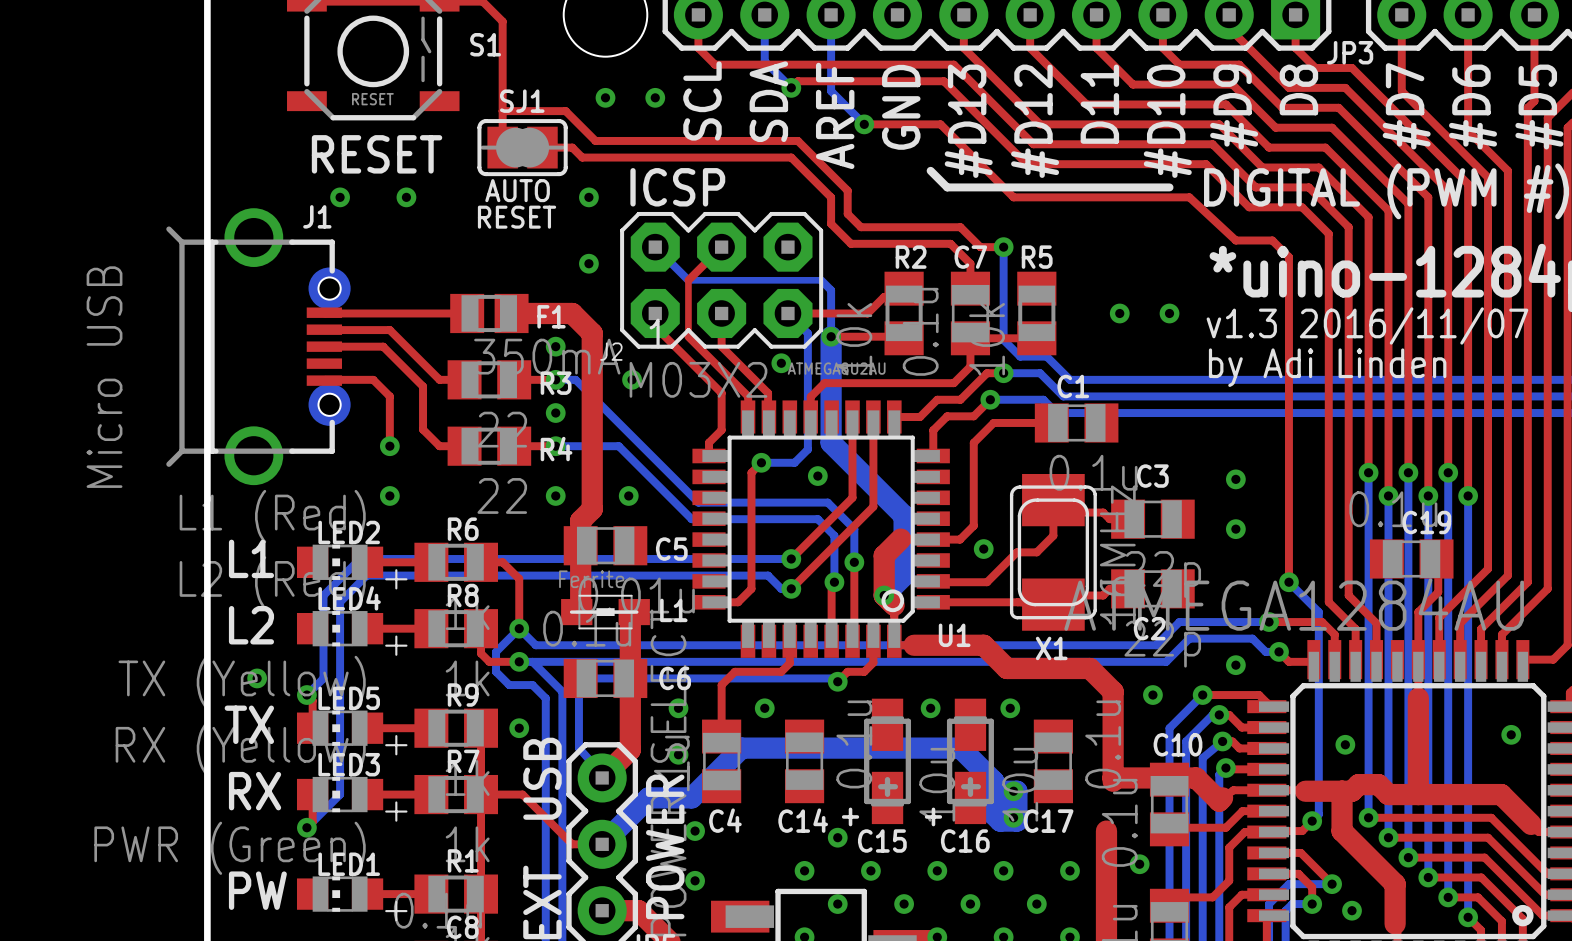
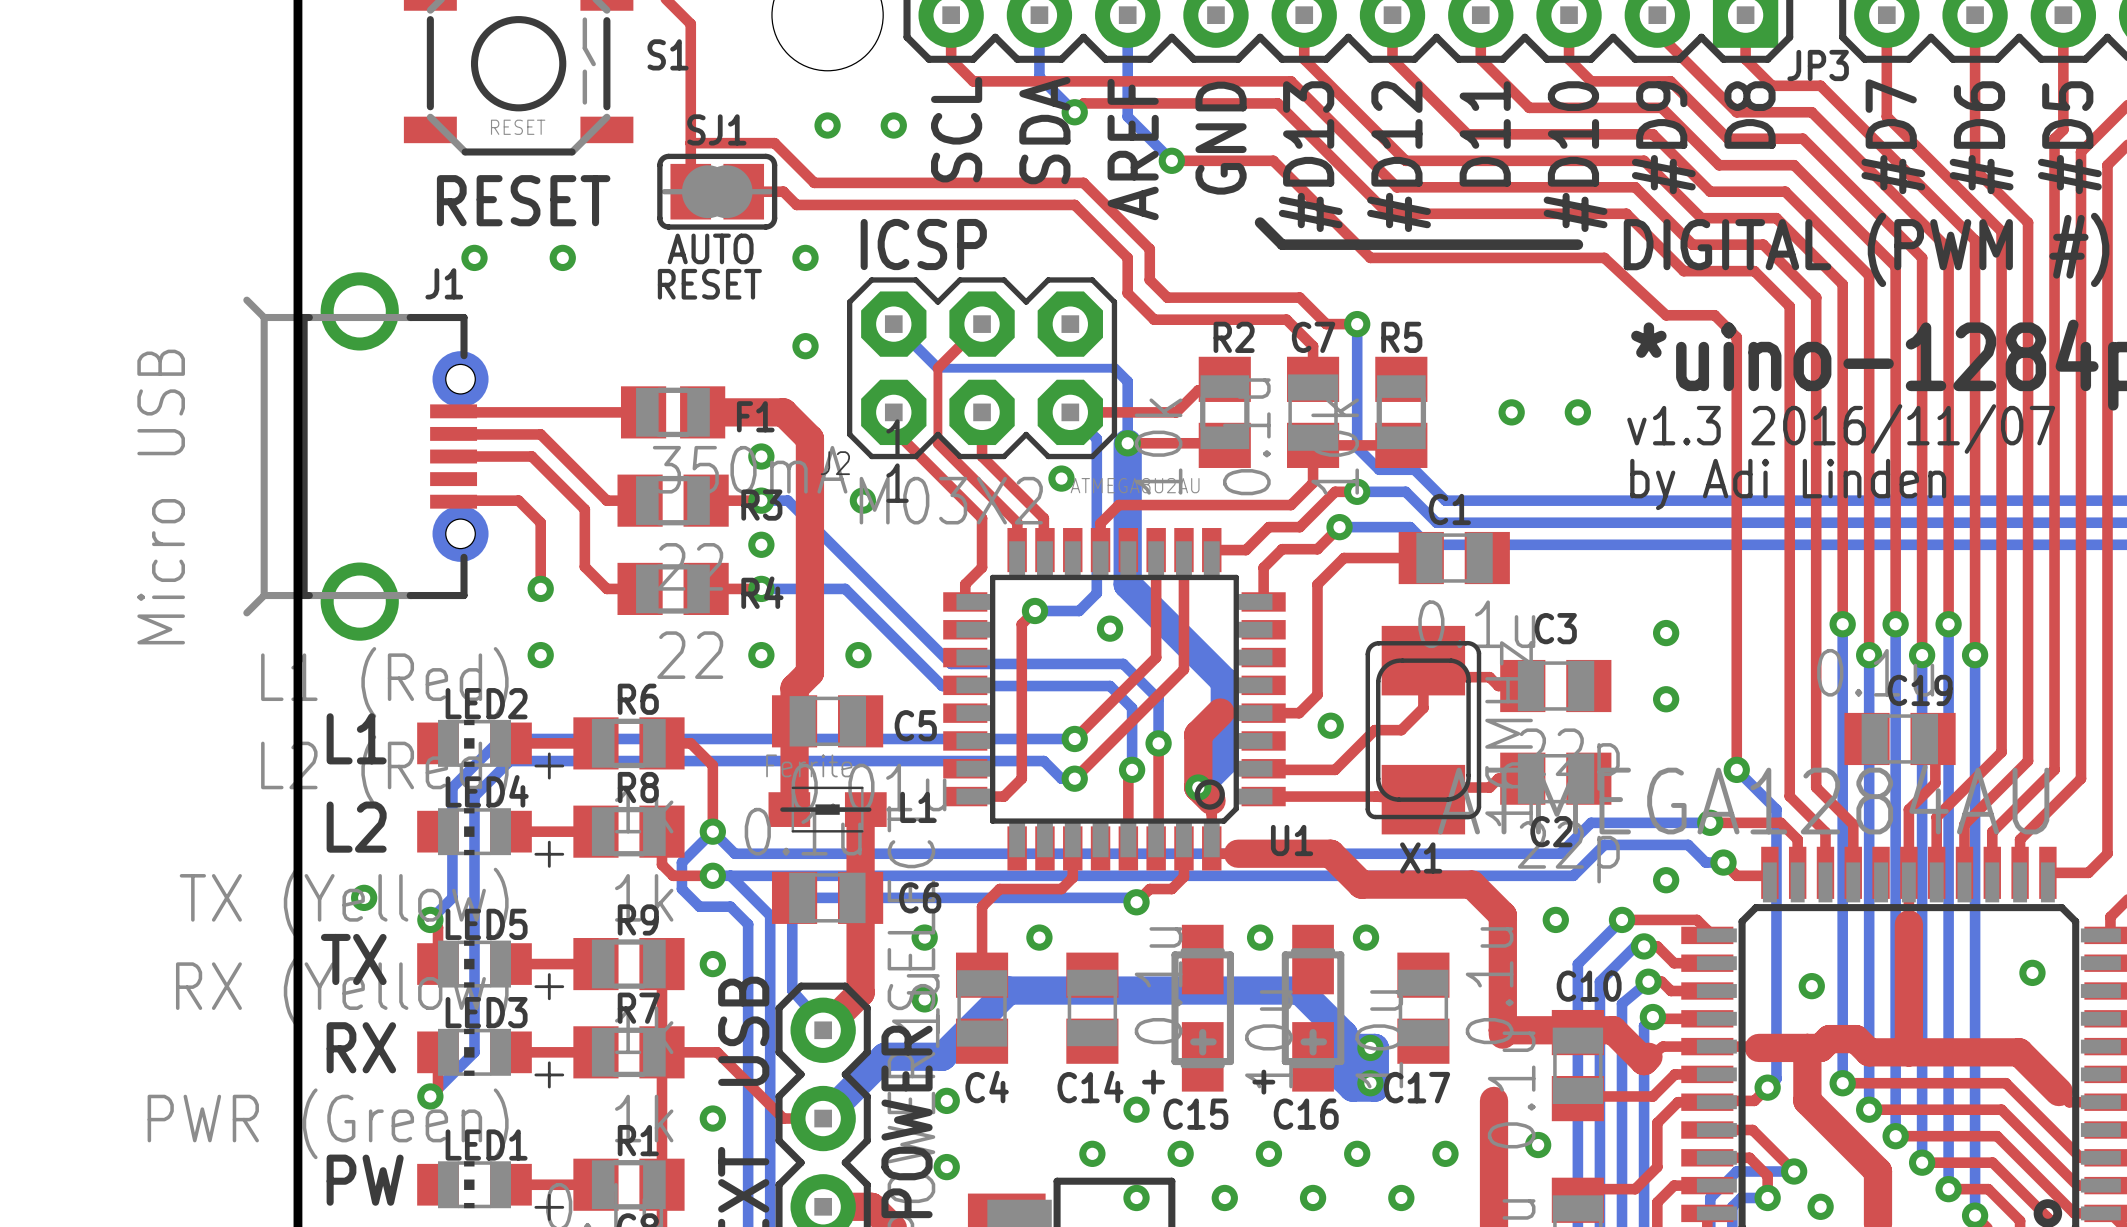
text: none -> 1 (897, 483)
via: none -> (712, 1118)

